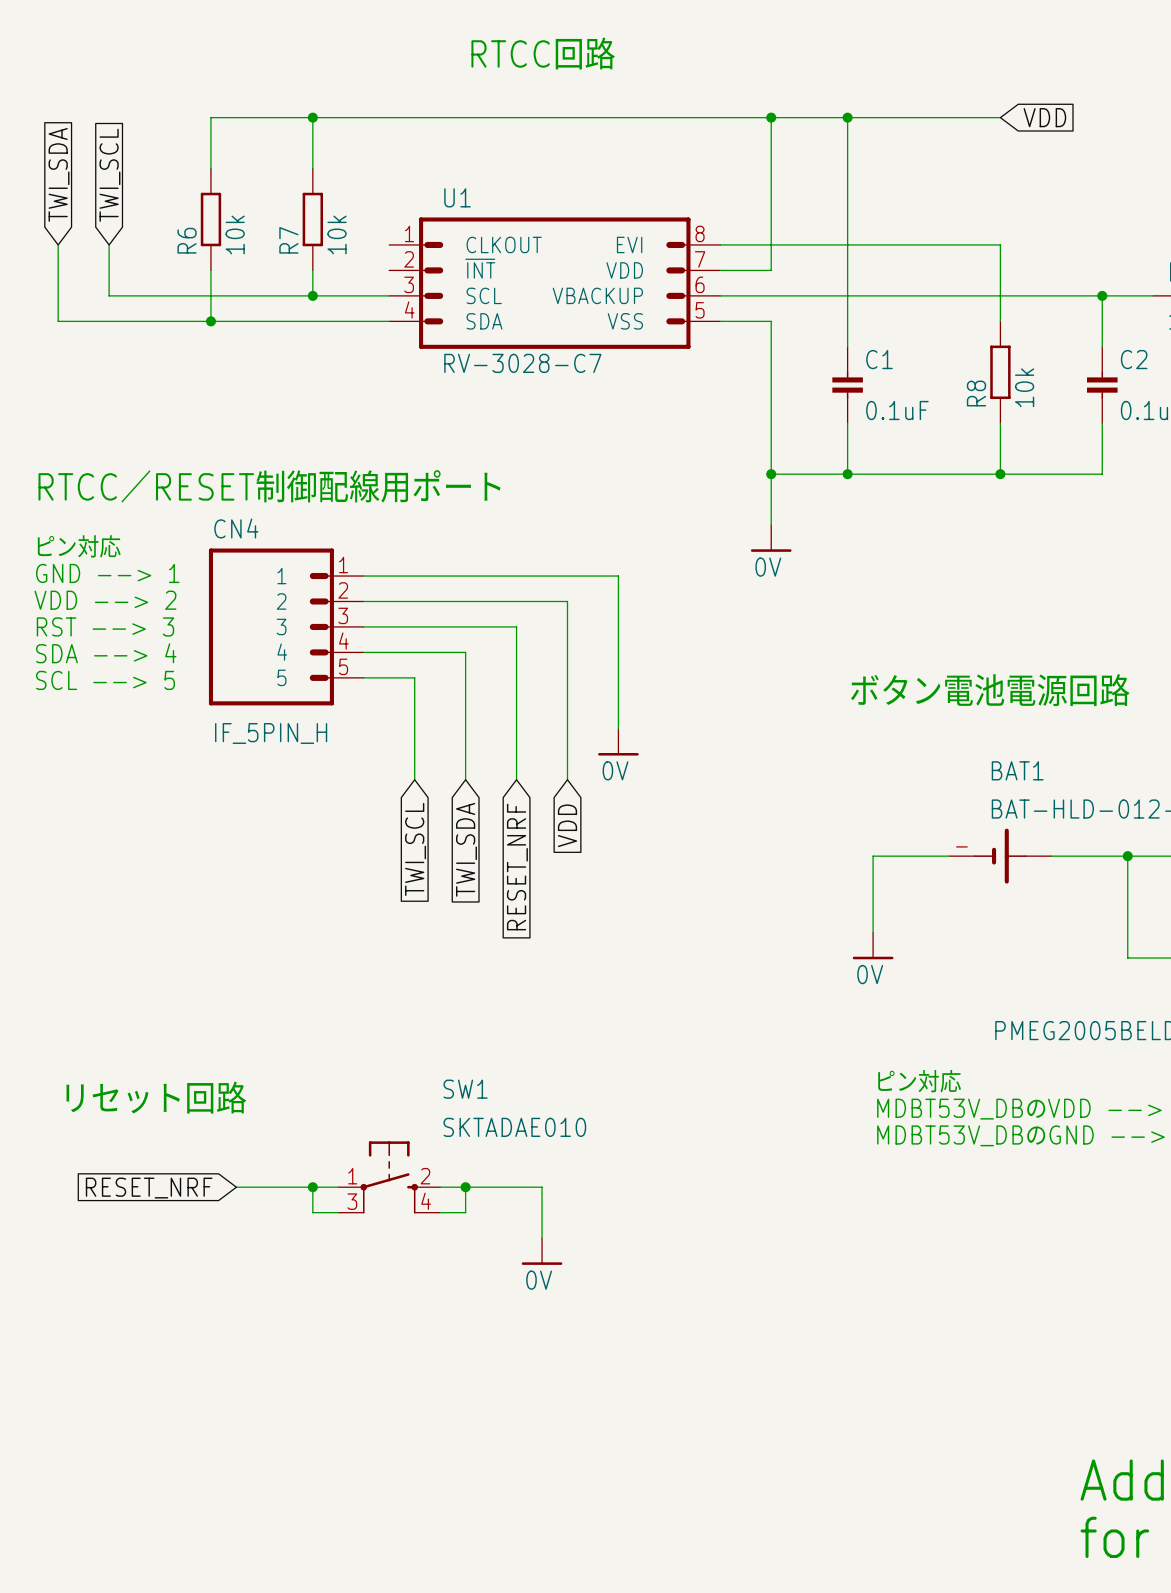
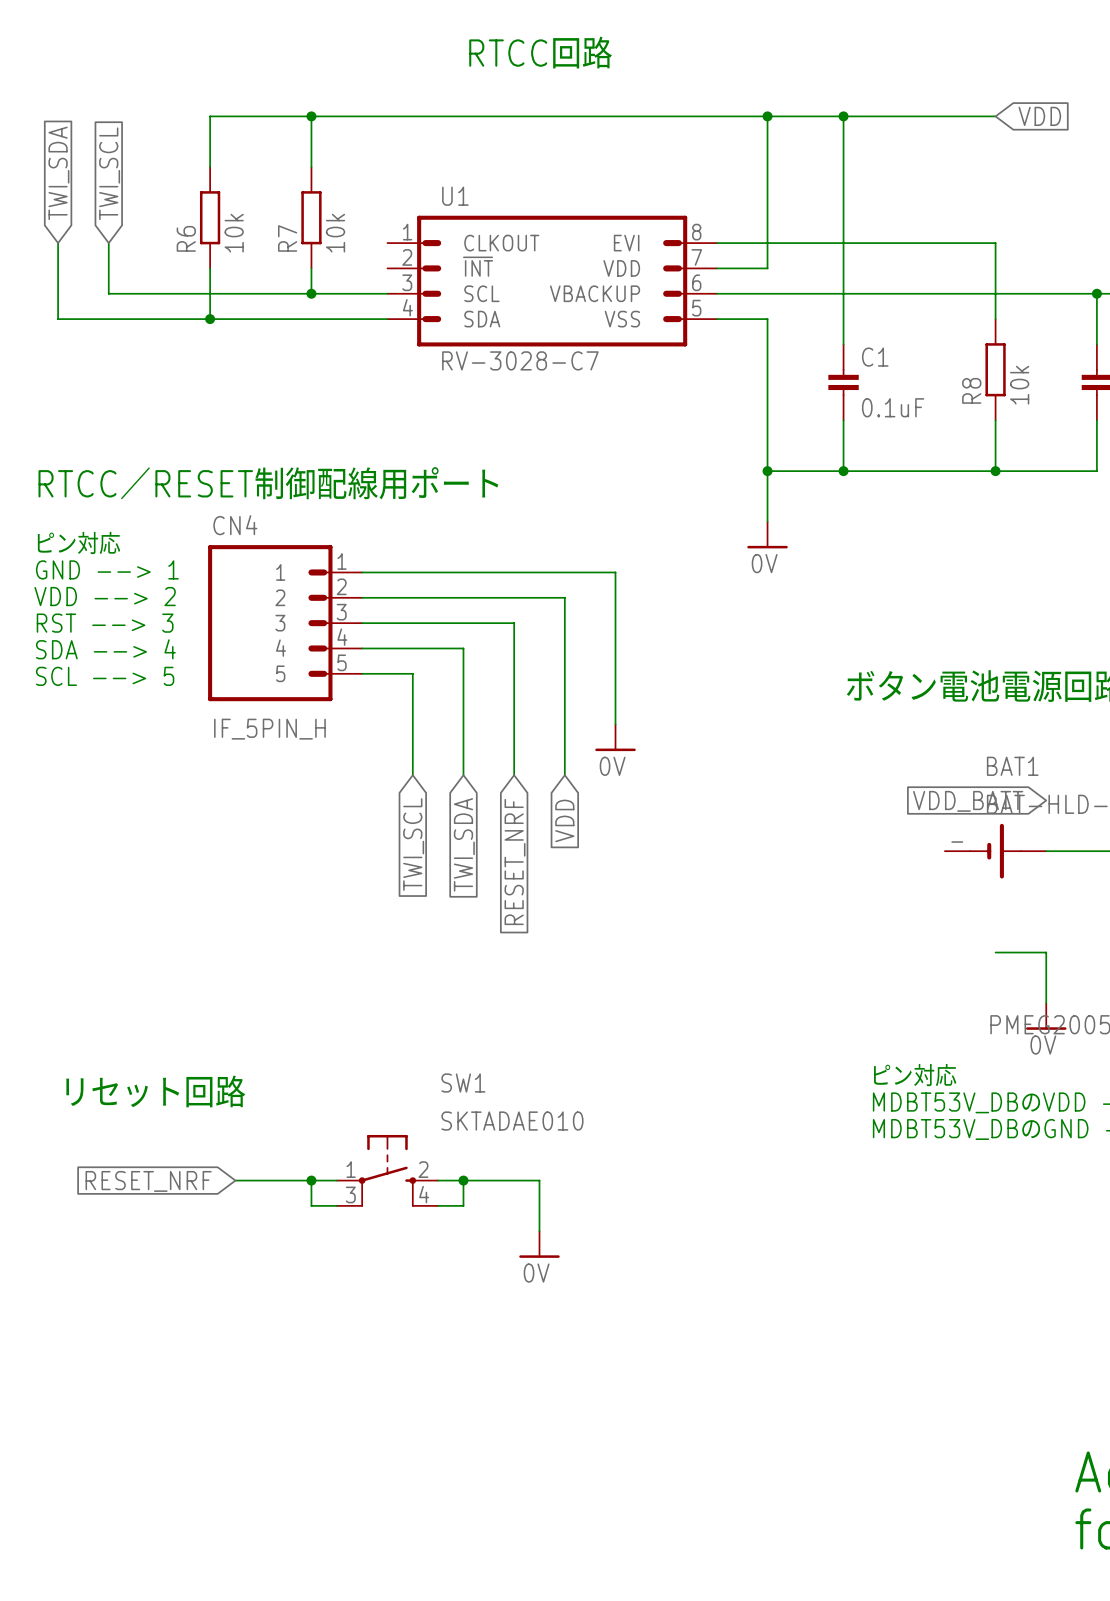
global label: none -> VDD_BATT (968, 801)
wire: (949, 856) (873, 856) (873, 932) -> none
power symbol: 0V (873, 945) -> none
wire: none -> (995, 952) (1046, 952) (1046, 1003)
power symbol: none -> 0V (1046, 1016)

